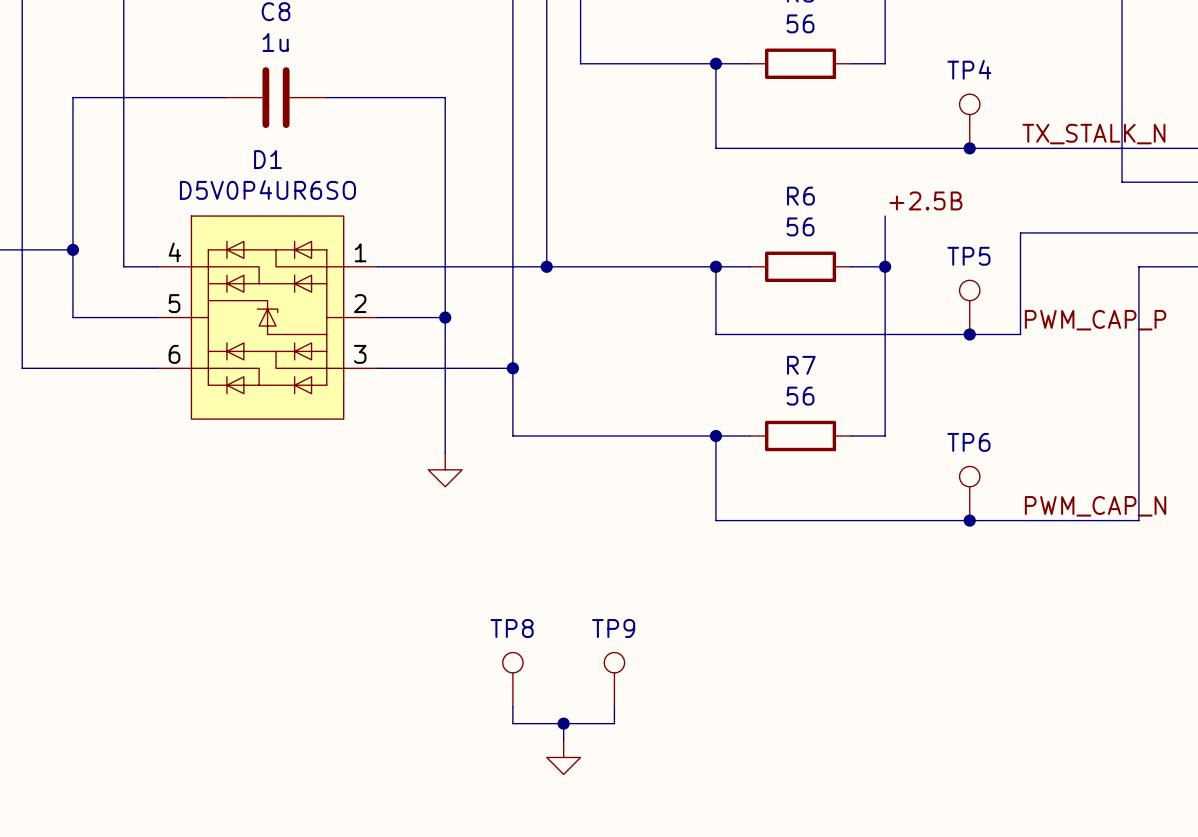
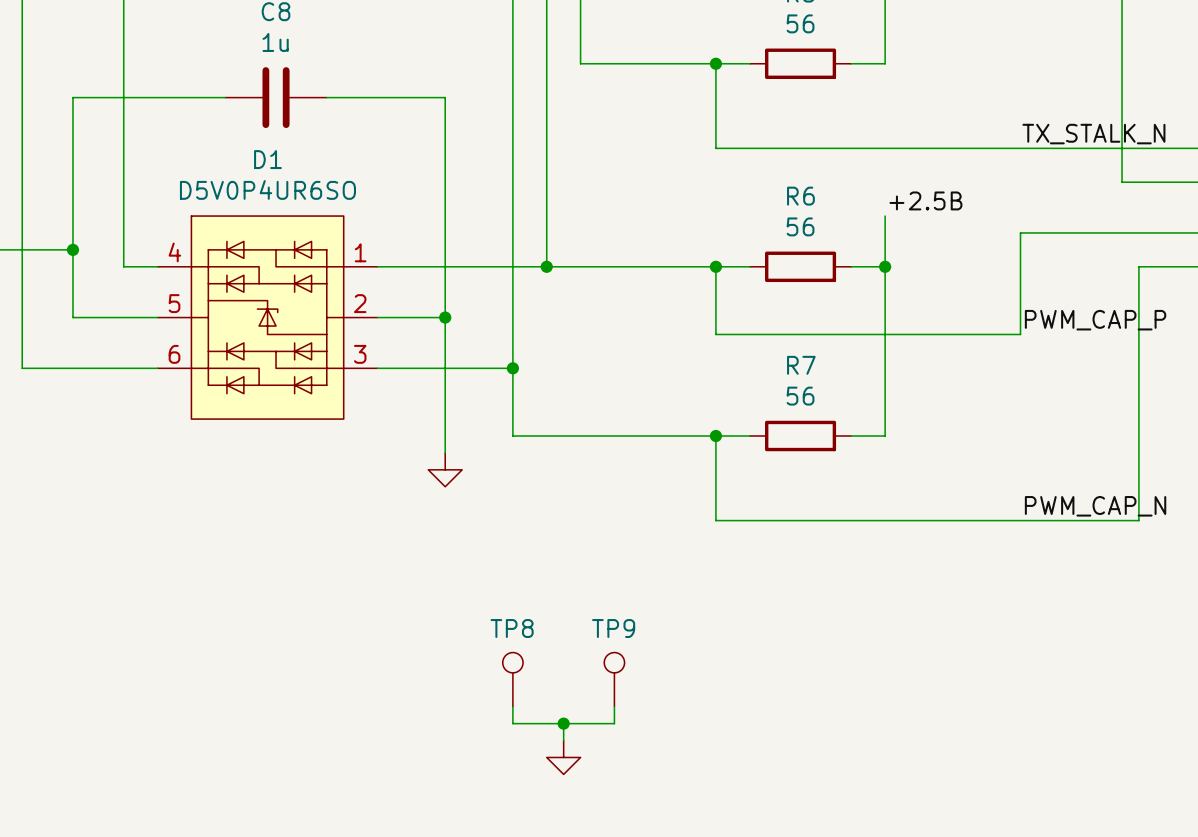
TP4: (969, 121) -> none
junction: (969, 148) -> none
TP5: (969, 307) -> none
junction: (969, 334) -> none
TP6: (969, 493) -> none
junction: (969, 520) -> none

